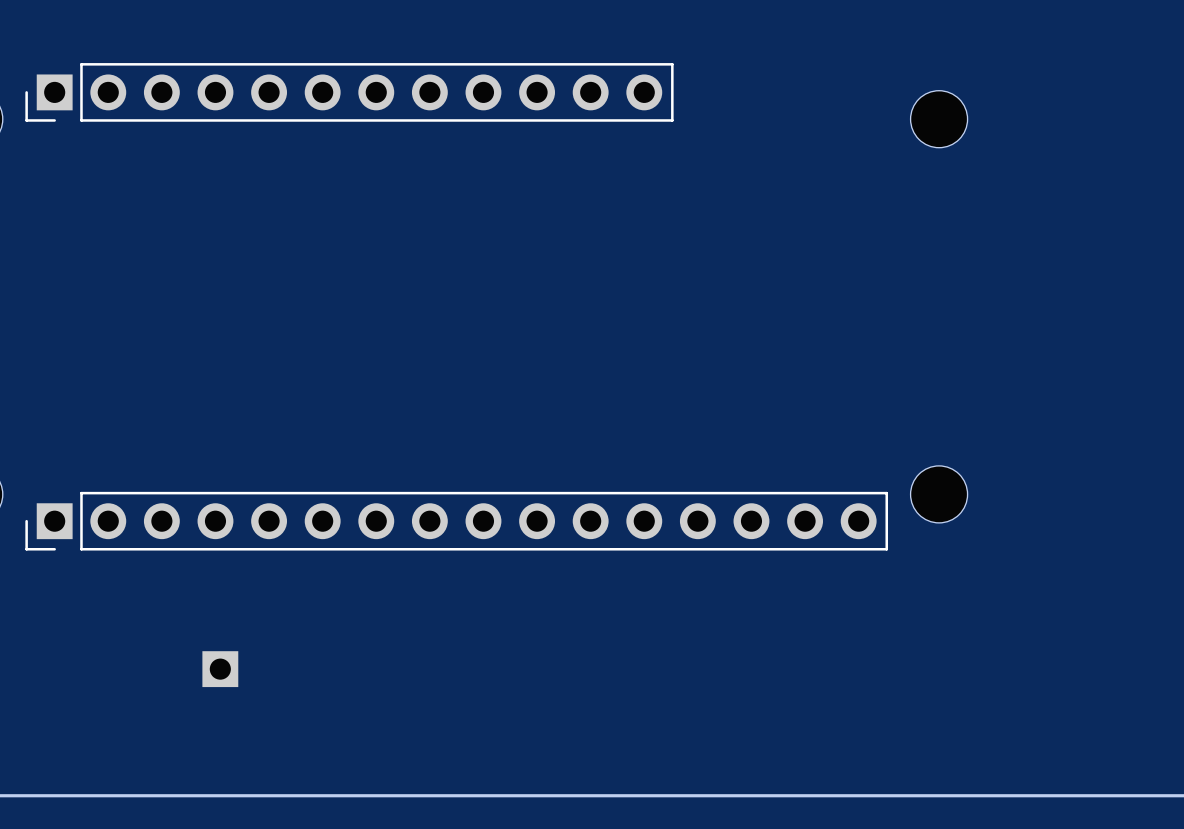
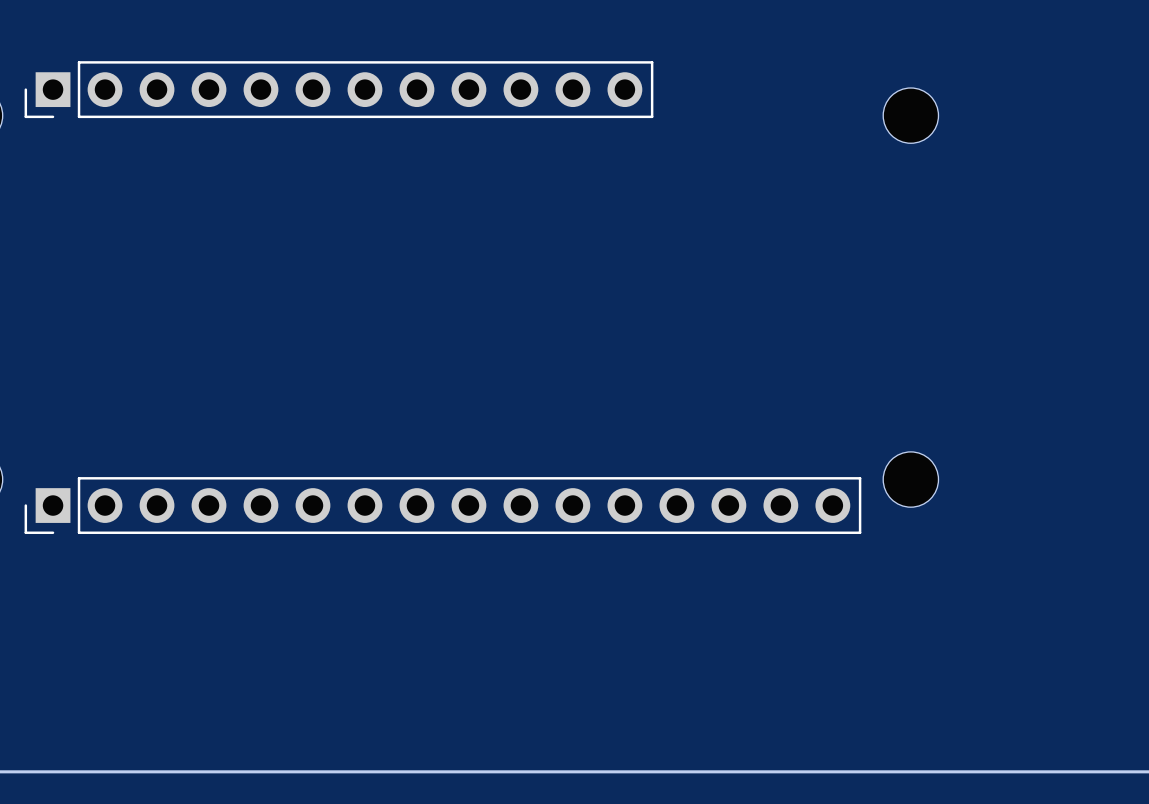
part: (220, 669) -> none

